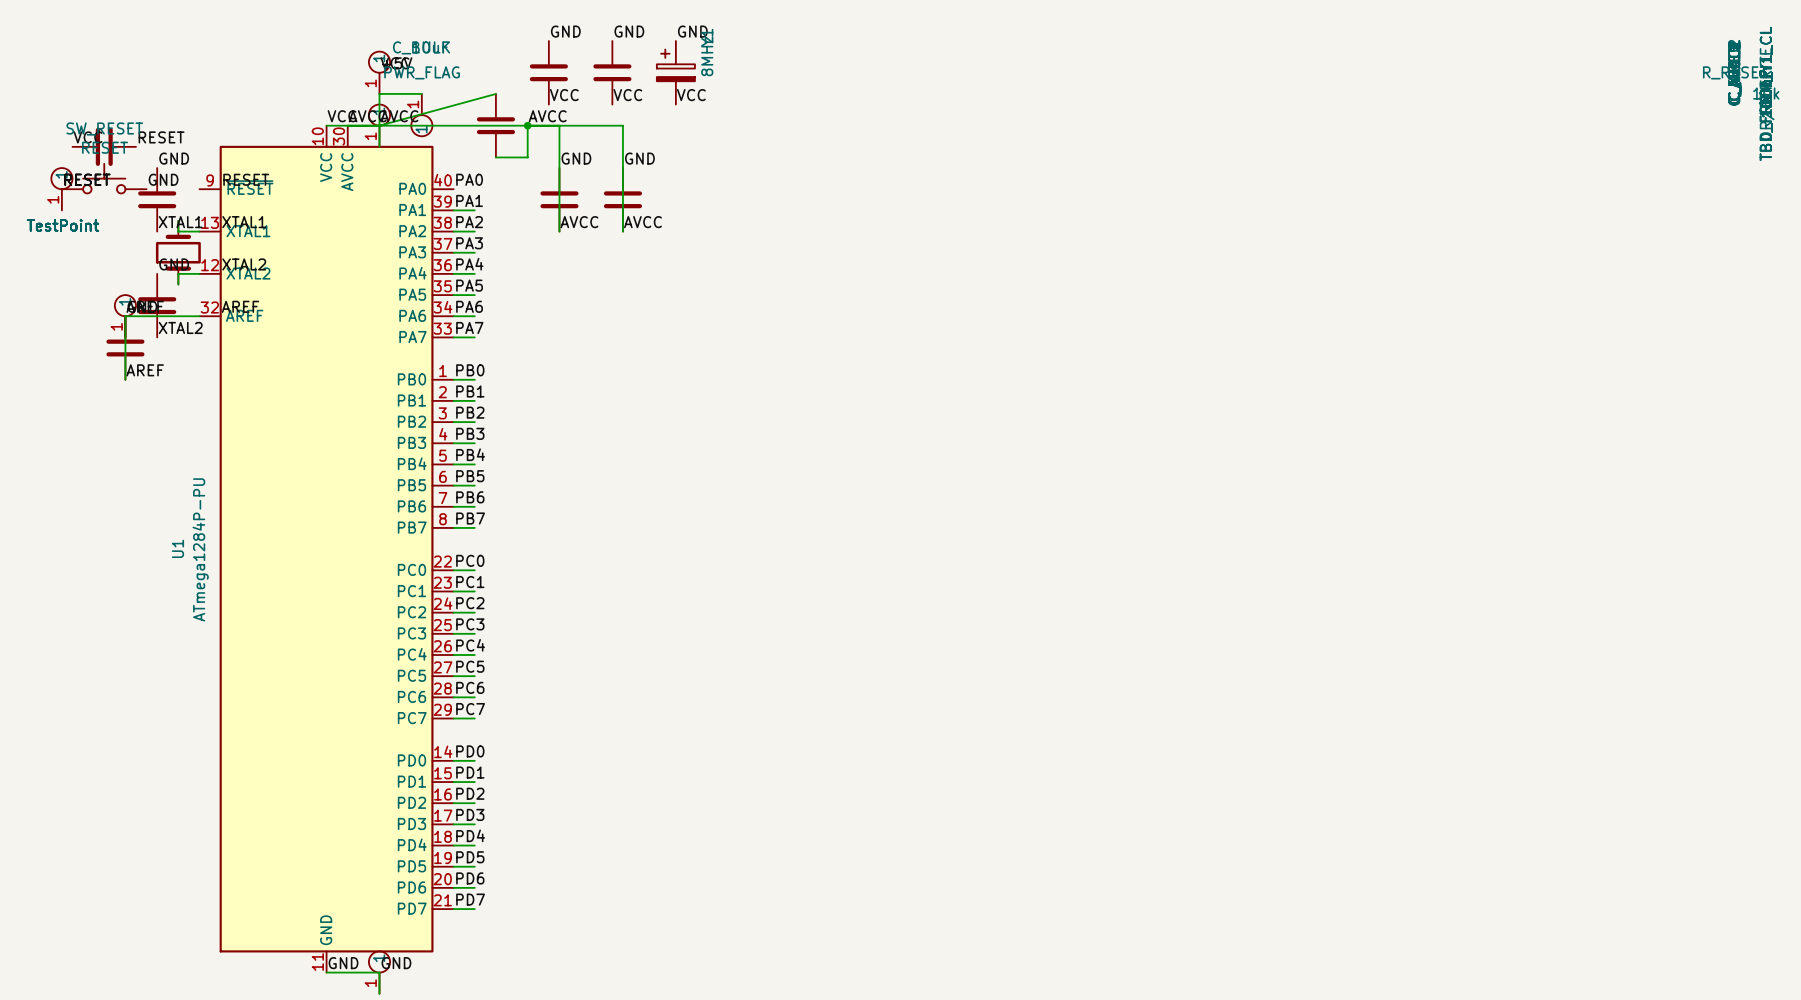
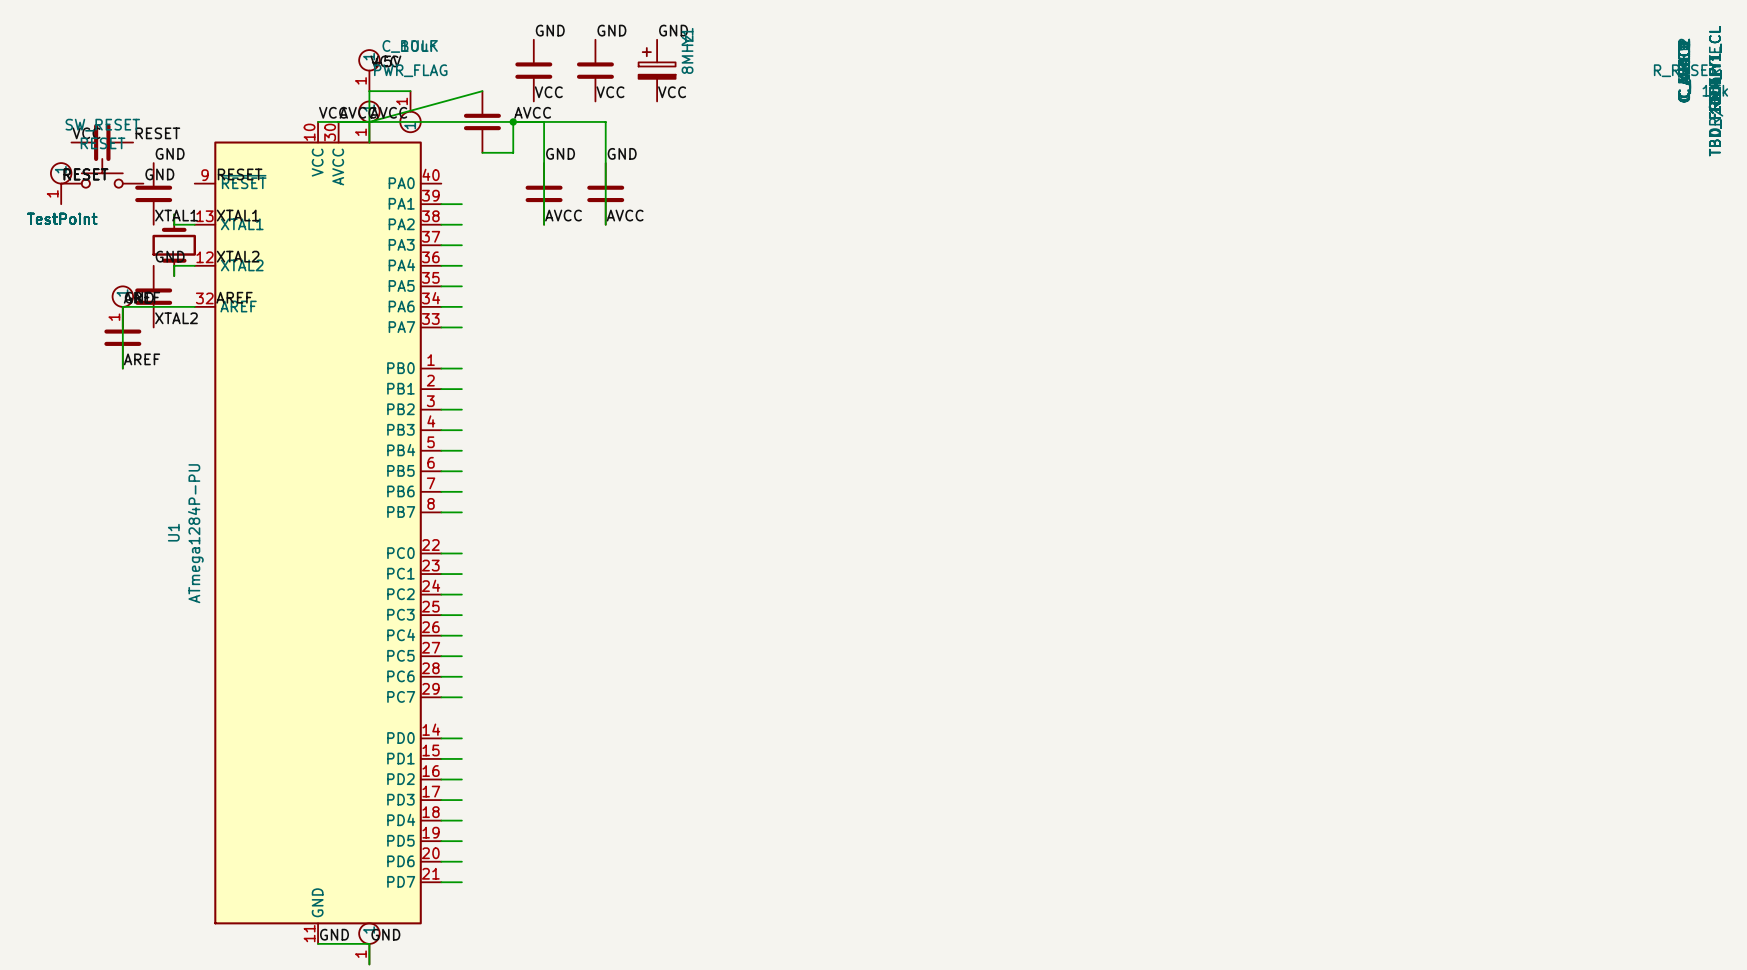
label: PA0 (469, 179) -> none
label: PA1 (469, 200) -> none
label: PA2 (469, 222) -> none
label: PA3 (469, 243) -> none
label: PA4 (469, 264) -> none
label: PA5 (469, 285) -> none
label: PA6 (469, 306) -> none
label: PA7 (469, 327) -> none
label: PB0 (470, 370) -> none
label: PB1 (470, 391) -> none
label: PB2 (470, 412) -> none
label: PB3 (470, 433) -> none
label: PB4 (470, 454) -> none
label: PB5 (470, 476) -> none
label: PB6 (470, 497) -> none
label: PB7 (470, 518) -> none
label: PC0 (470, 560) -> none
label: PC1 (470, 582) -> none
label: PC2 (470, 603) -> none
label: PC3 (470, 624) -> none
label: PC4 (470, 645) -> none
label: PC5 (470, 666) -> none
label: PC6 (470, 687) -> none
label: PC7 (470, 709) -> none
label: PD0 (470, 751) -> none
label: PD1 (470, 772) -> none
label: PD2 (470, 793) -> none
label: PD3 (470, 814) -> none
label: PD4 (470, 835) -> none
label: PD5 (470, 857) -> none
label: PD6 (470, 878) -> none
label: PD7 (470, 899) -> none

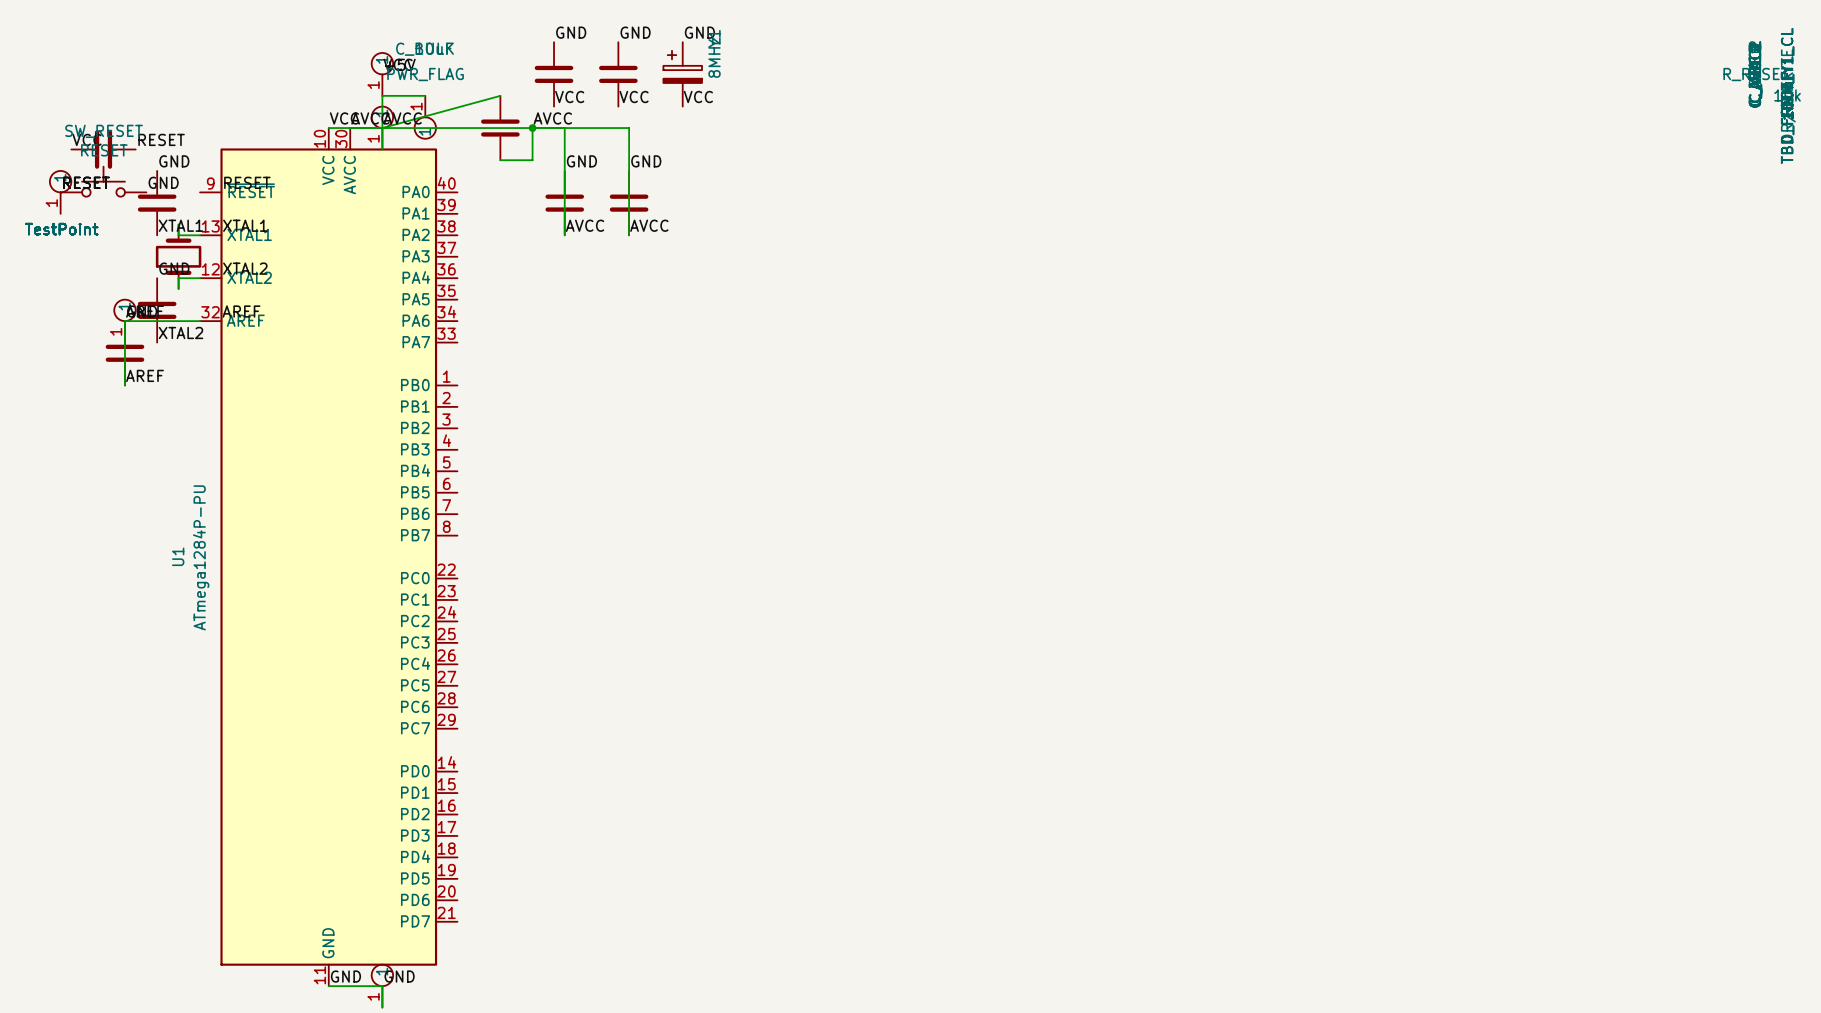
wire: (441, 204) (461, 204) -> none
wire: (441, 224) (461, 224) -> none
wire: (441, 245) (461, 245) -> none
wire: (441, 265) (461, 265) -> none
wire: (441, 286) (461, 286) -> none
wire: (441, 306) (461, 306) -> none
wire: (441, 327) (461, 327) -> none
wire: (441, 368) (461, 368) -> none
wire: (441, 389) (461, 389) -> none
wire: (441, 409) (461, 409) -> none
wire: (441, 430) (461, 430) -> none
wire: (441, 450) (461, 450) -> none
wire: (441, 471) (461, 471) -> none
wire: (441, 491) (461, 491) -> none
wire: (441, 512) (461, 512) -> none
wire: (441, 553) (461, 553) -> none
wire: (441, 574) (461, 574) -> none
wire: (441, 594) (461, 594) -> none
wire: (441, 615) (461, 615) -> none
wire: (441, 635) (461, 635) -> none
wire: (441, 656) (461, 656) -> none
wire: (441, 676) (461, 676) -> none
wire: (441, 697) (461, 697) -> none
wire: (441, 738) (461, 738) -> none
wire: (441, 758) (461, 758) -> none
wire: (441, 779) (461, 779) -> none
wire: (441, 800) (461, 800) -> none
wire: (441, 820) (461, 820) -> none
wire: (441, 841) (461, 841) -> none
wire: (441, 861) (461, 861) -> none
wire: (441, 882) (461, 882) -> none

